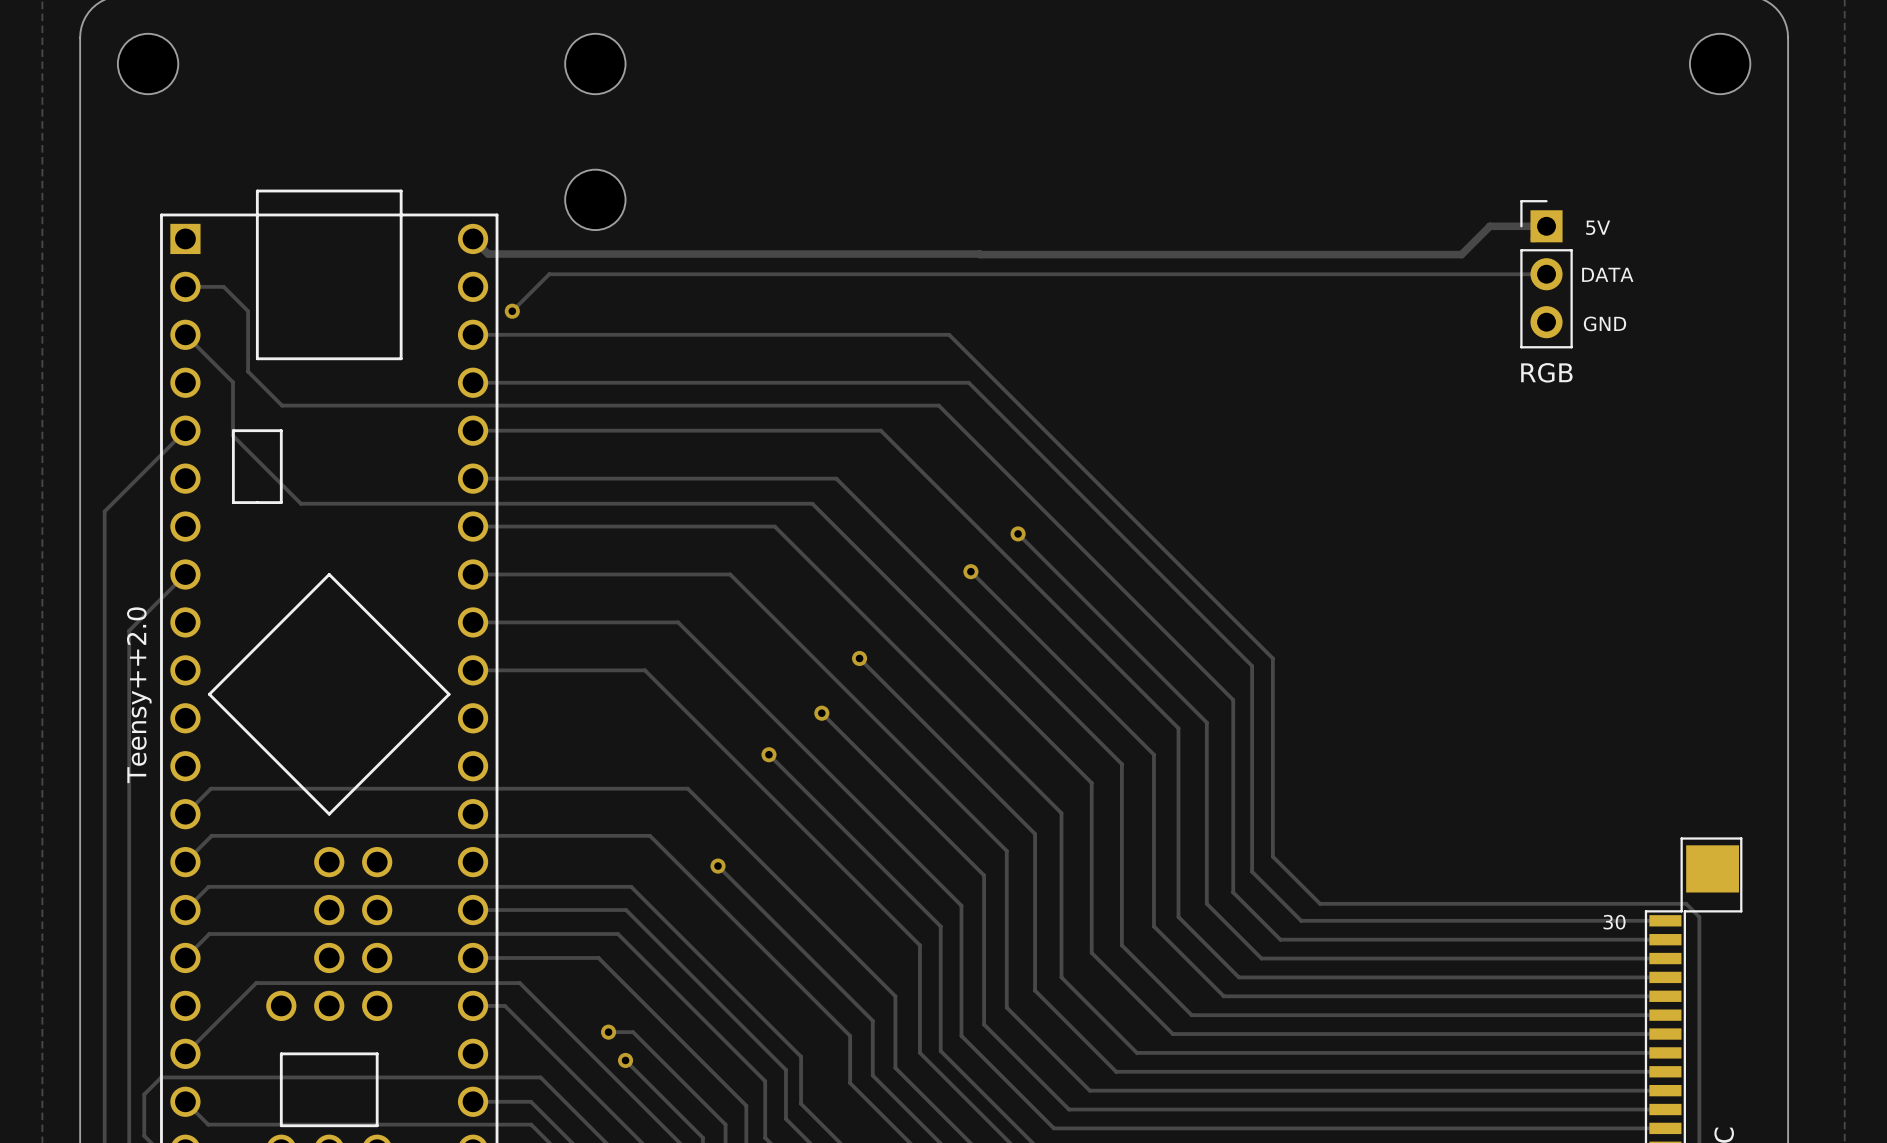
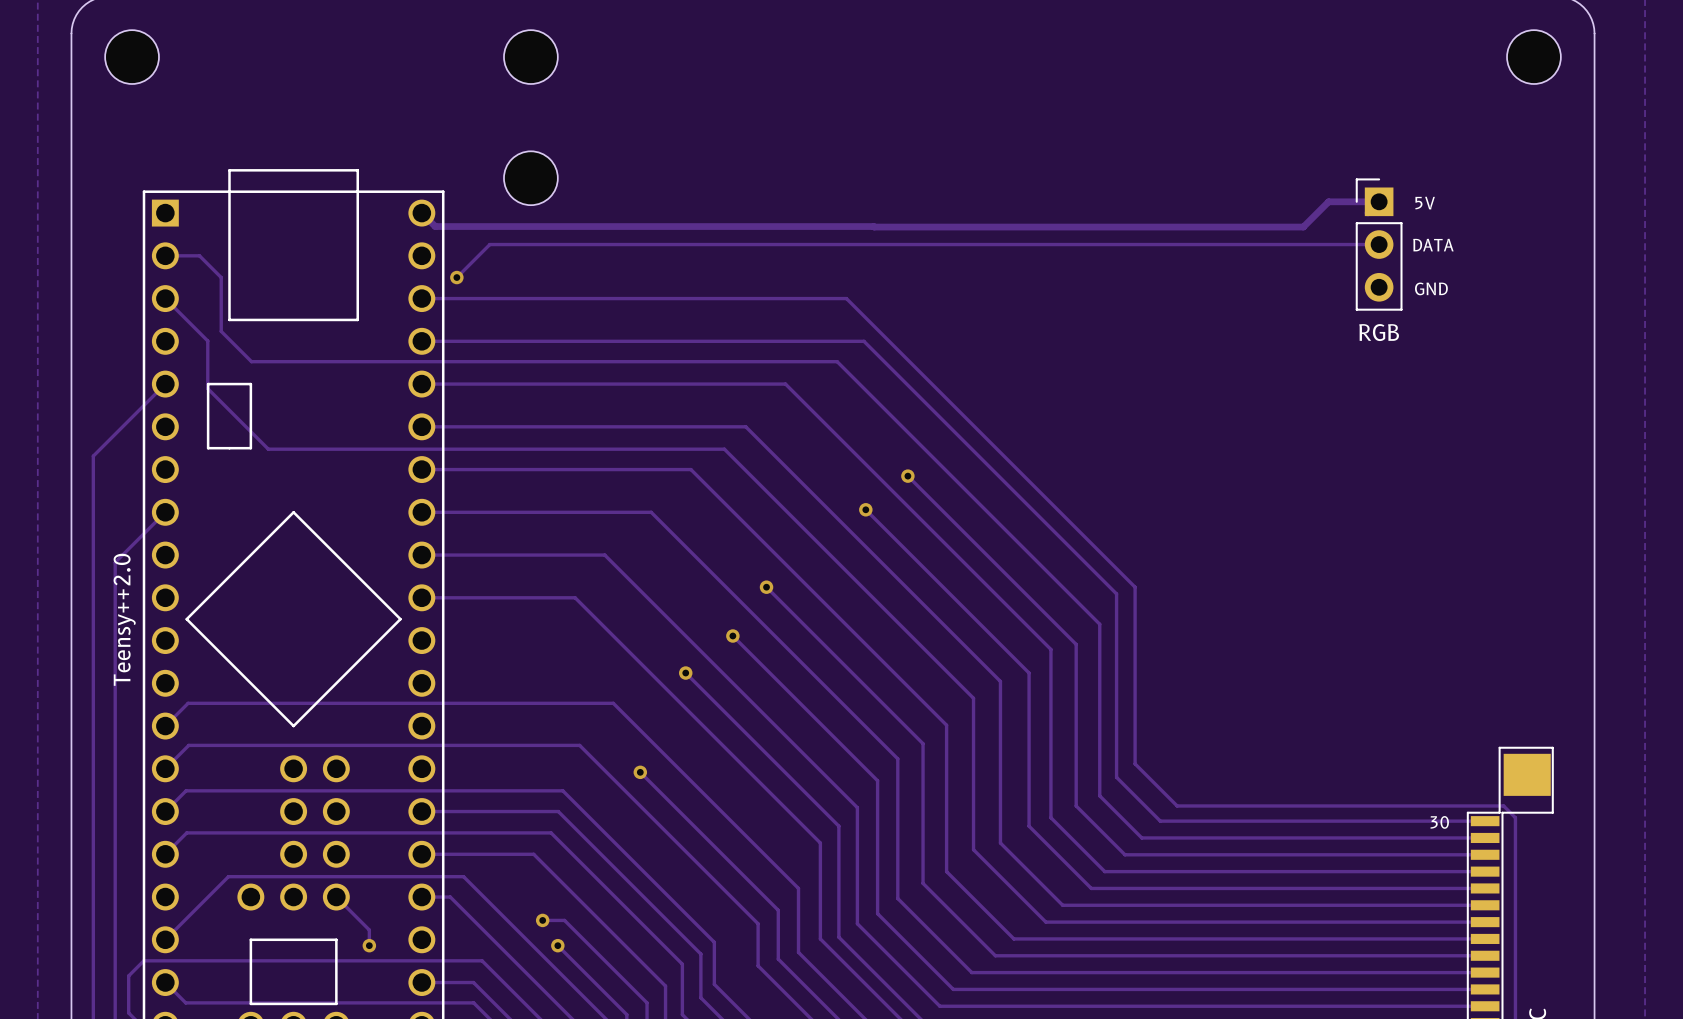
track: none -> (336, 897) (369, 930) (369, 945)
via: none -> (369, 945)

